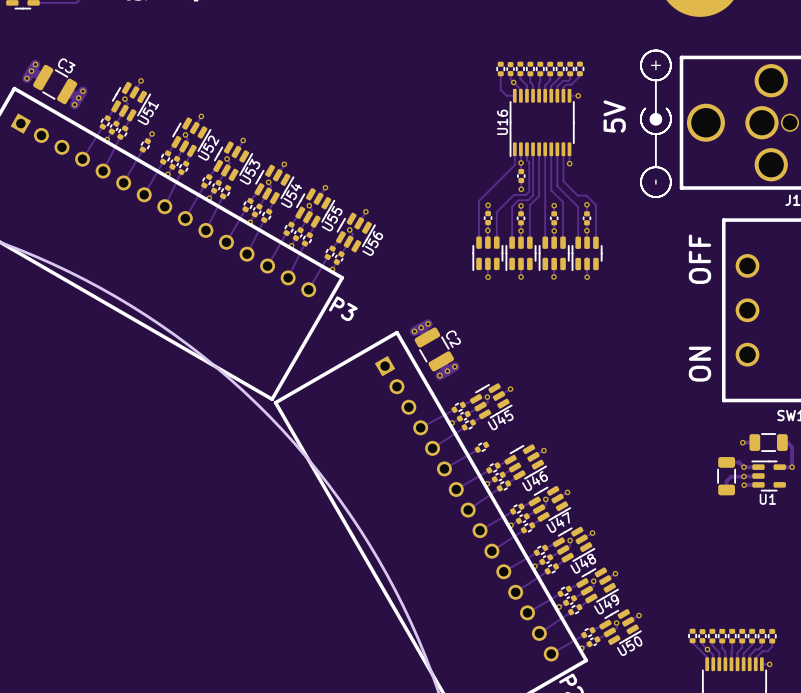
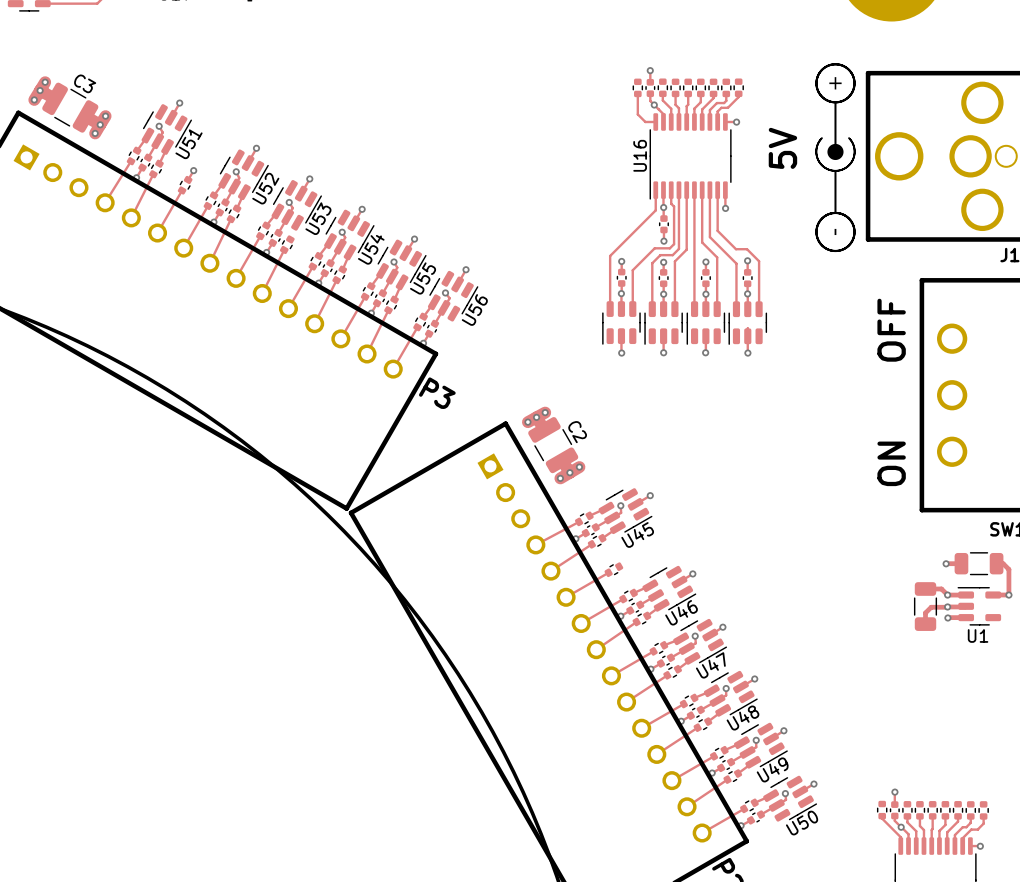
track: none -> (650, 70) (650, 82)
via: none -> (650, 70)
track: none -> (894, 792) (894, 804)
via: none -> (894, 792)

